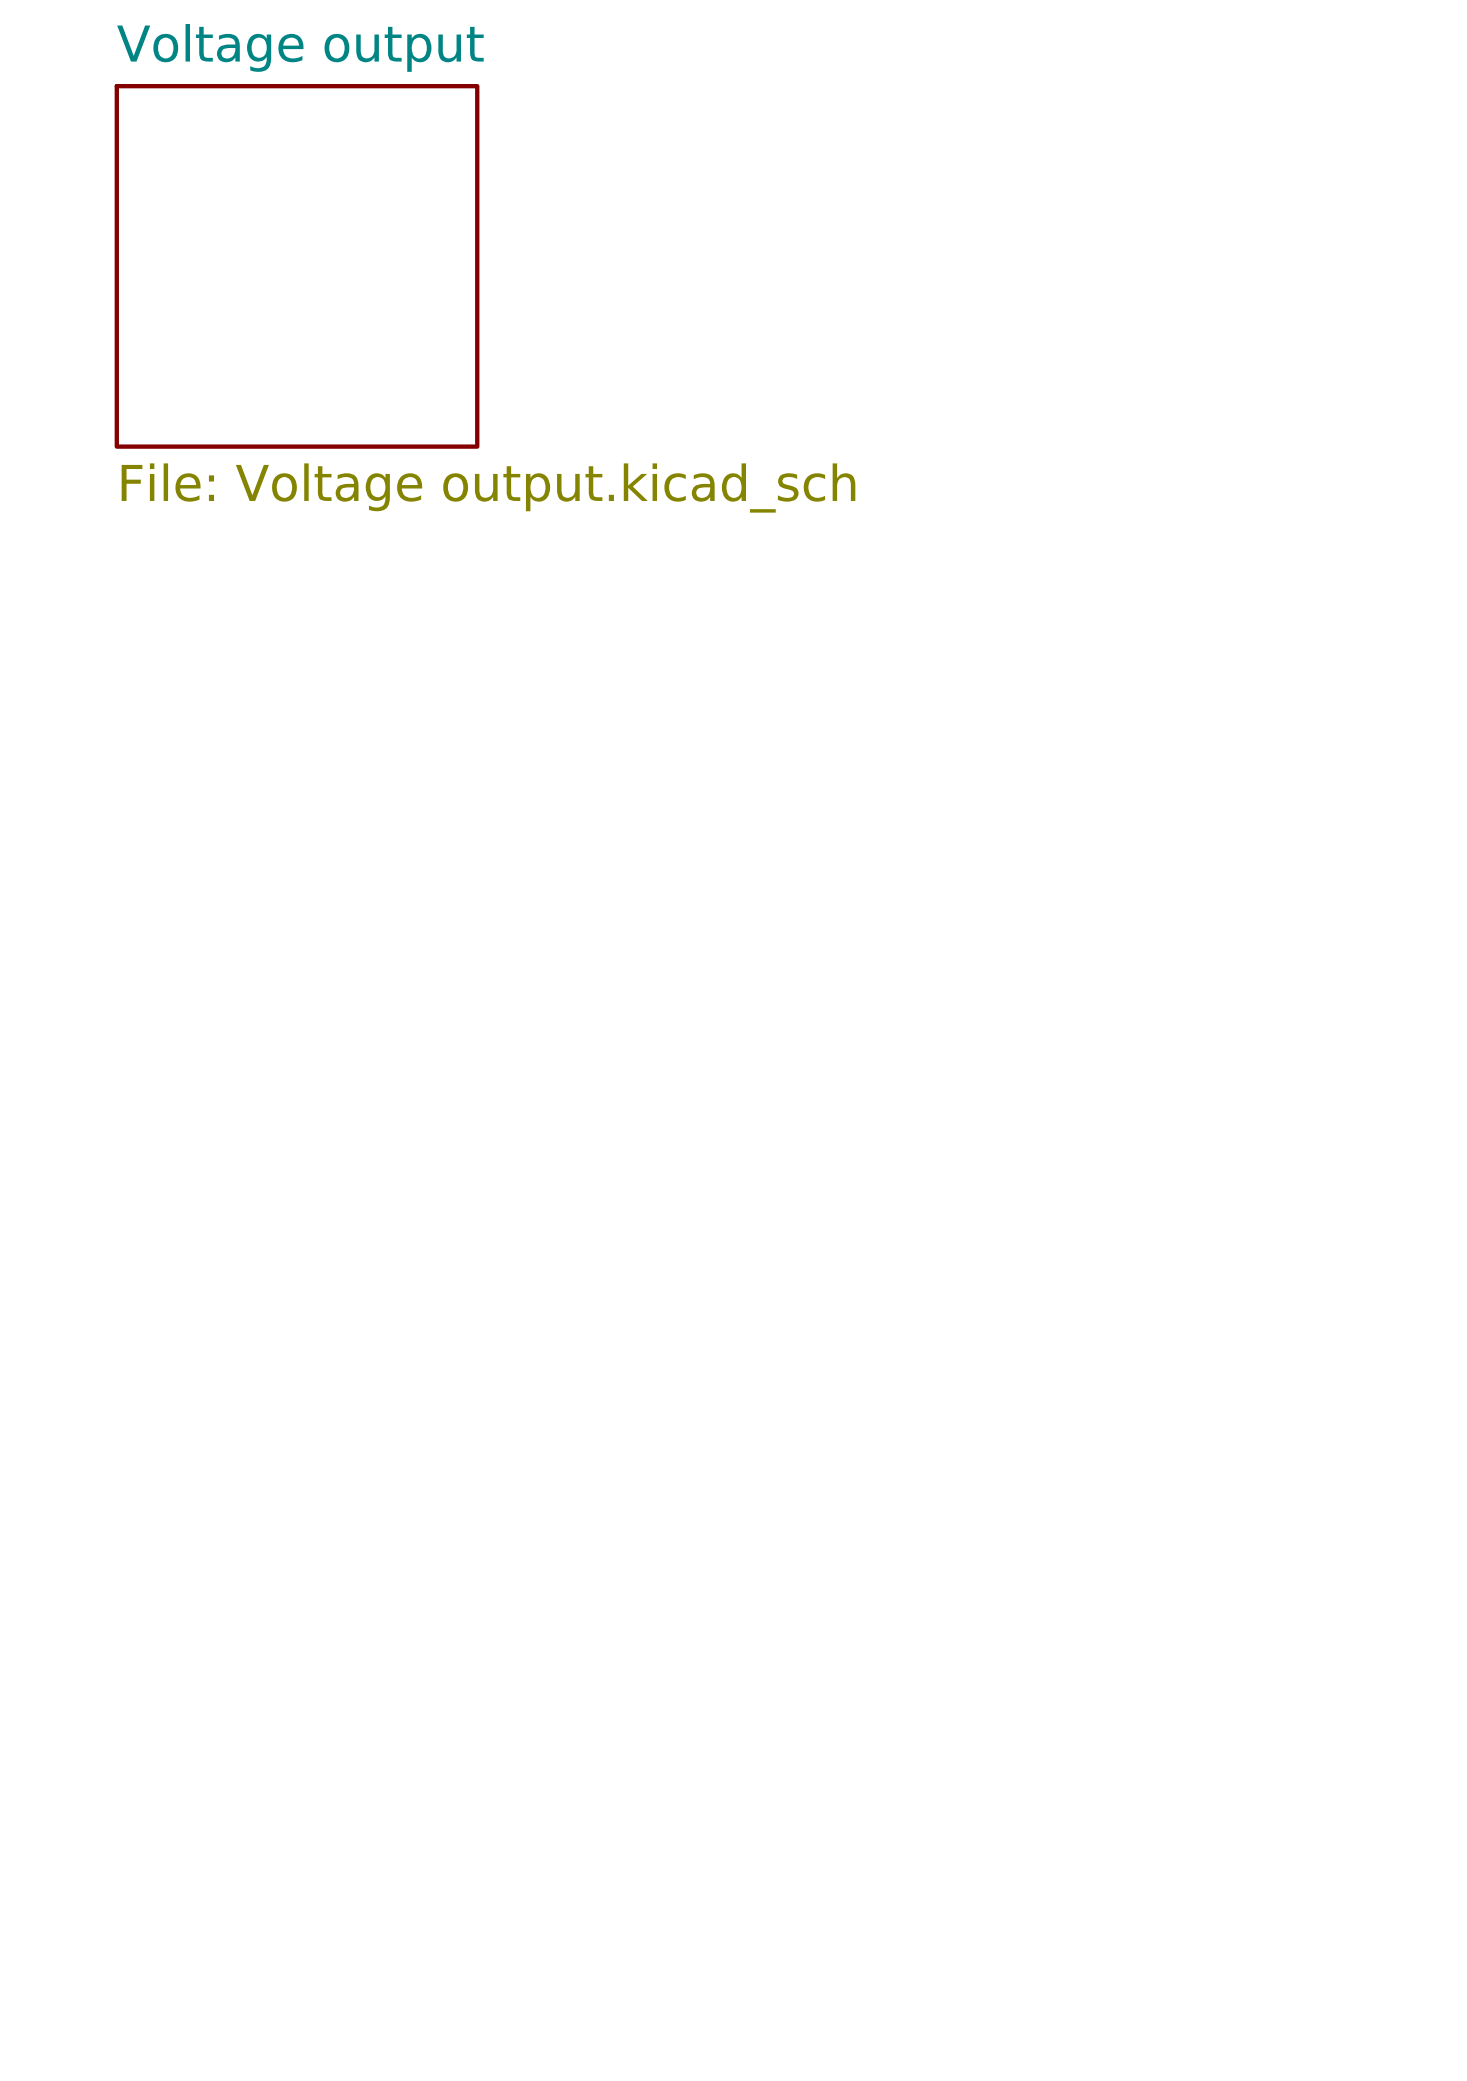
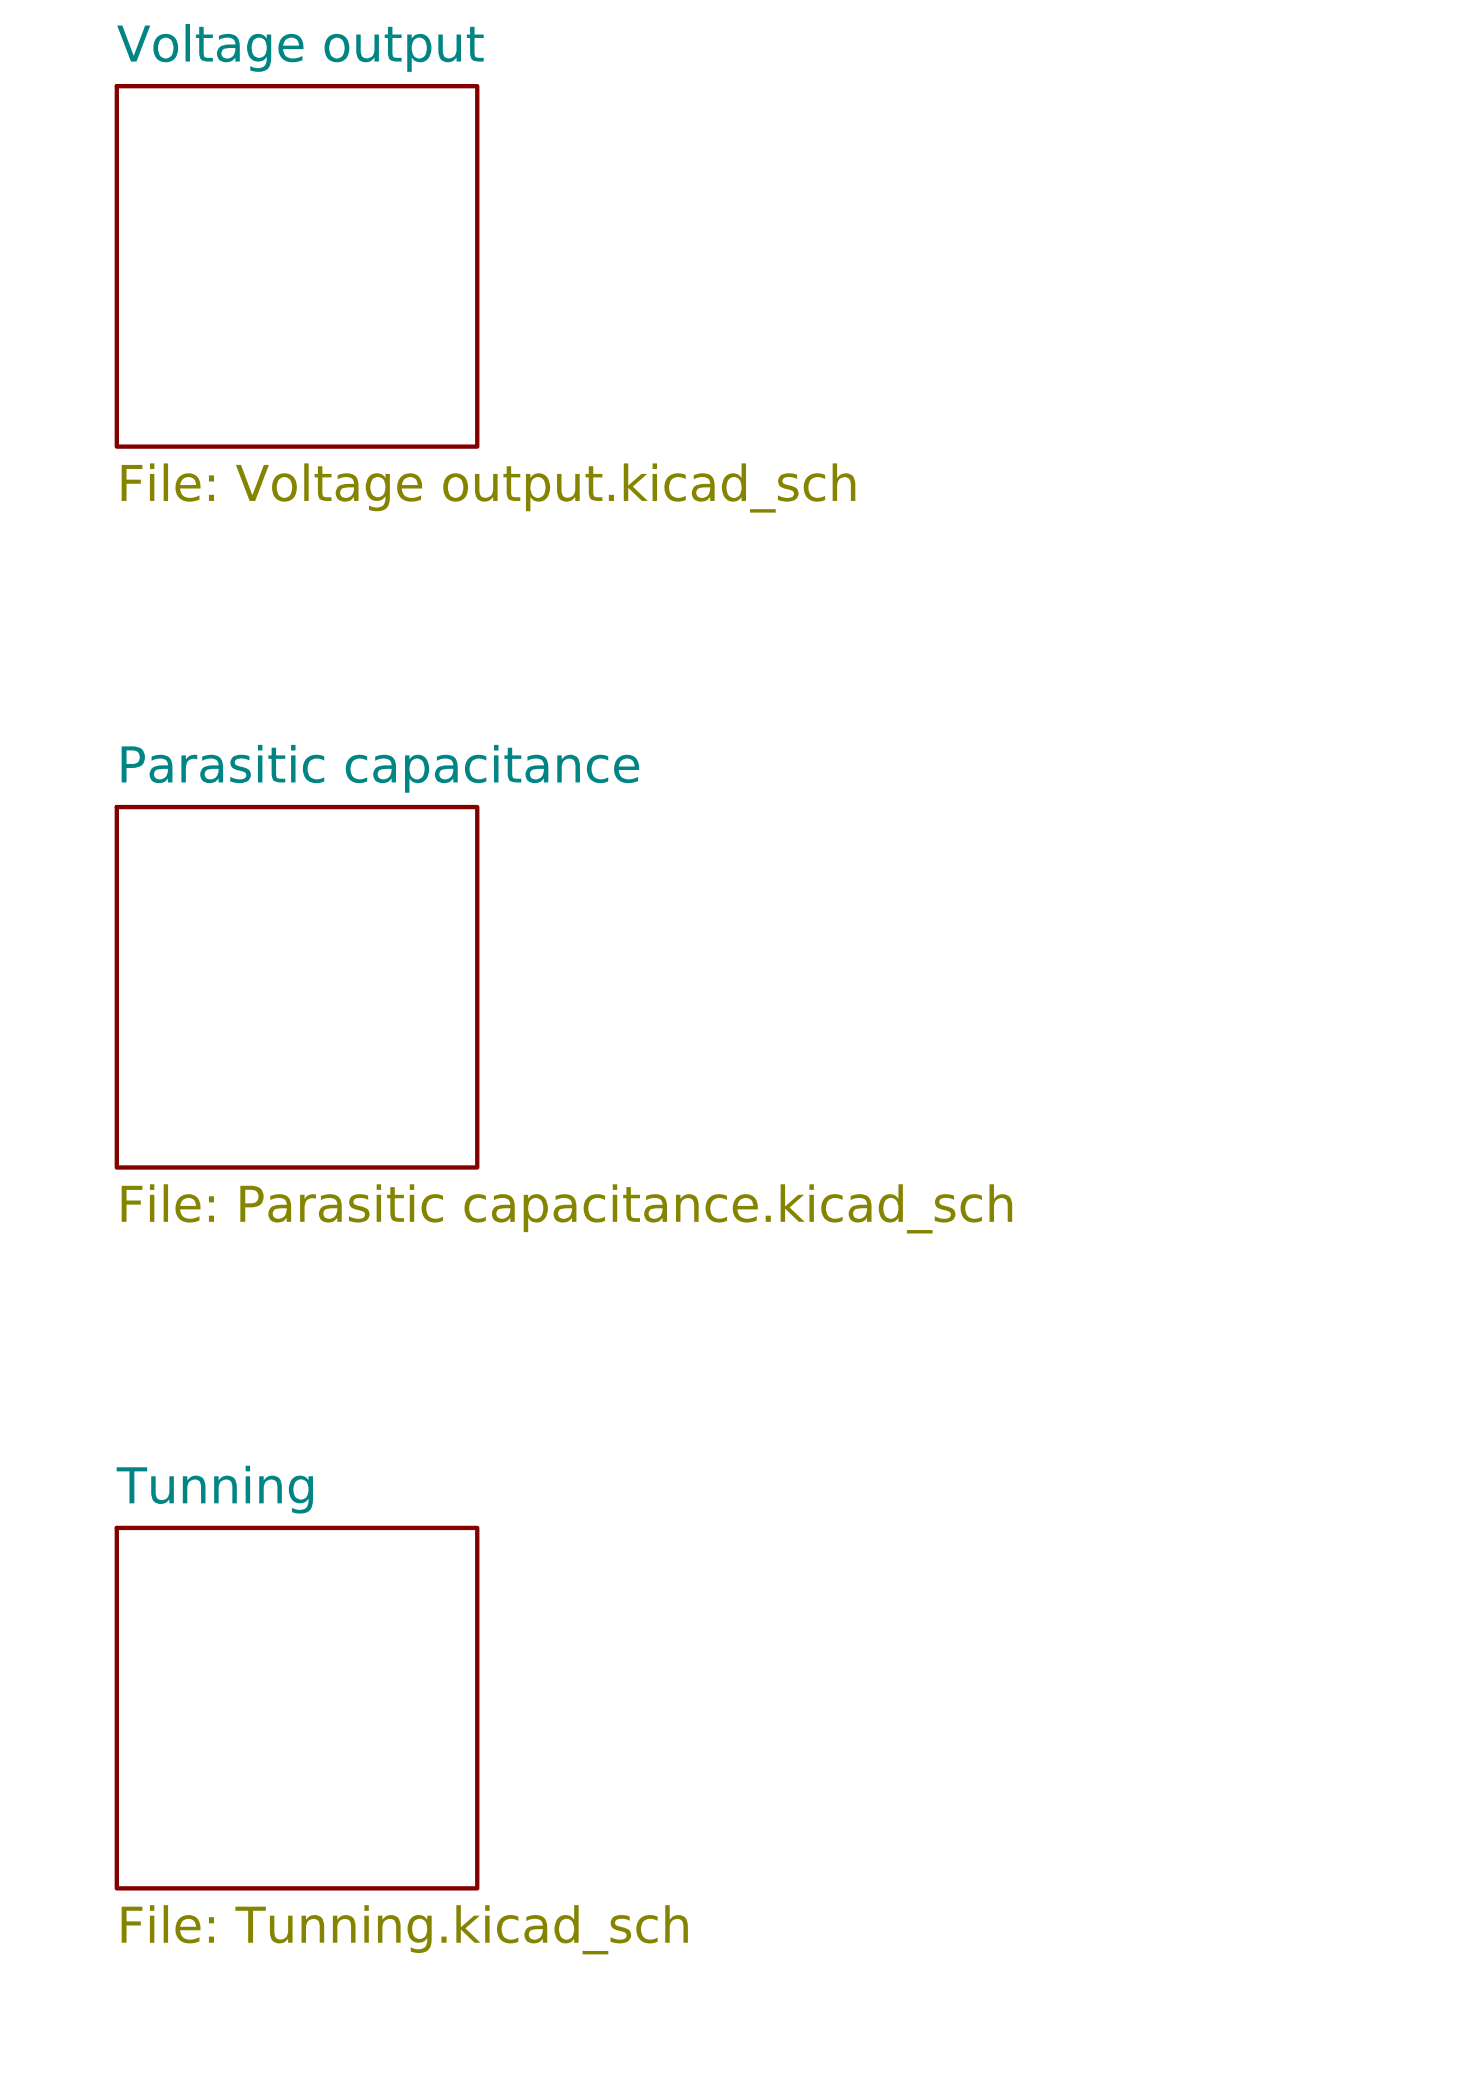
sheet Parasitic capacitance: none -> File: Parasitic capacitance.kicad_sch (297, 987)
sheet Tunning: none -> File: Tunning.kicad_sch (297, 1708)

